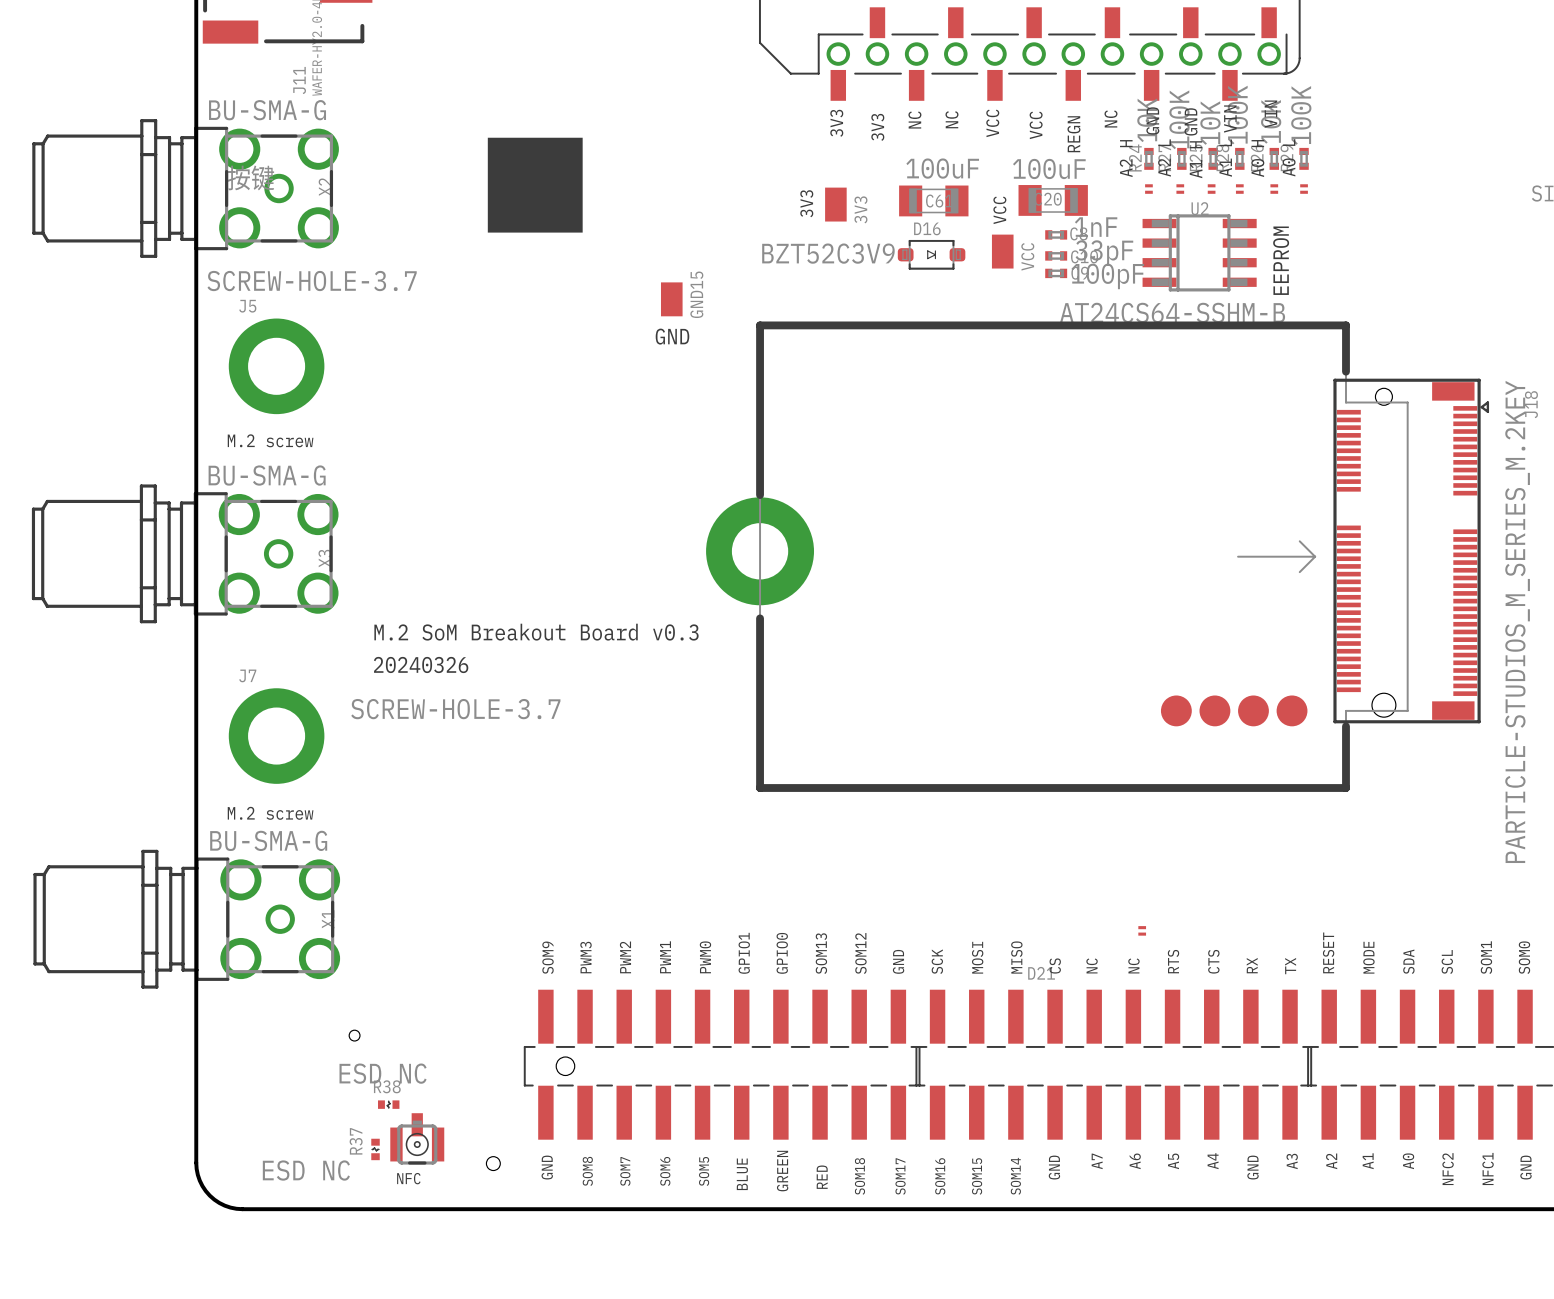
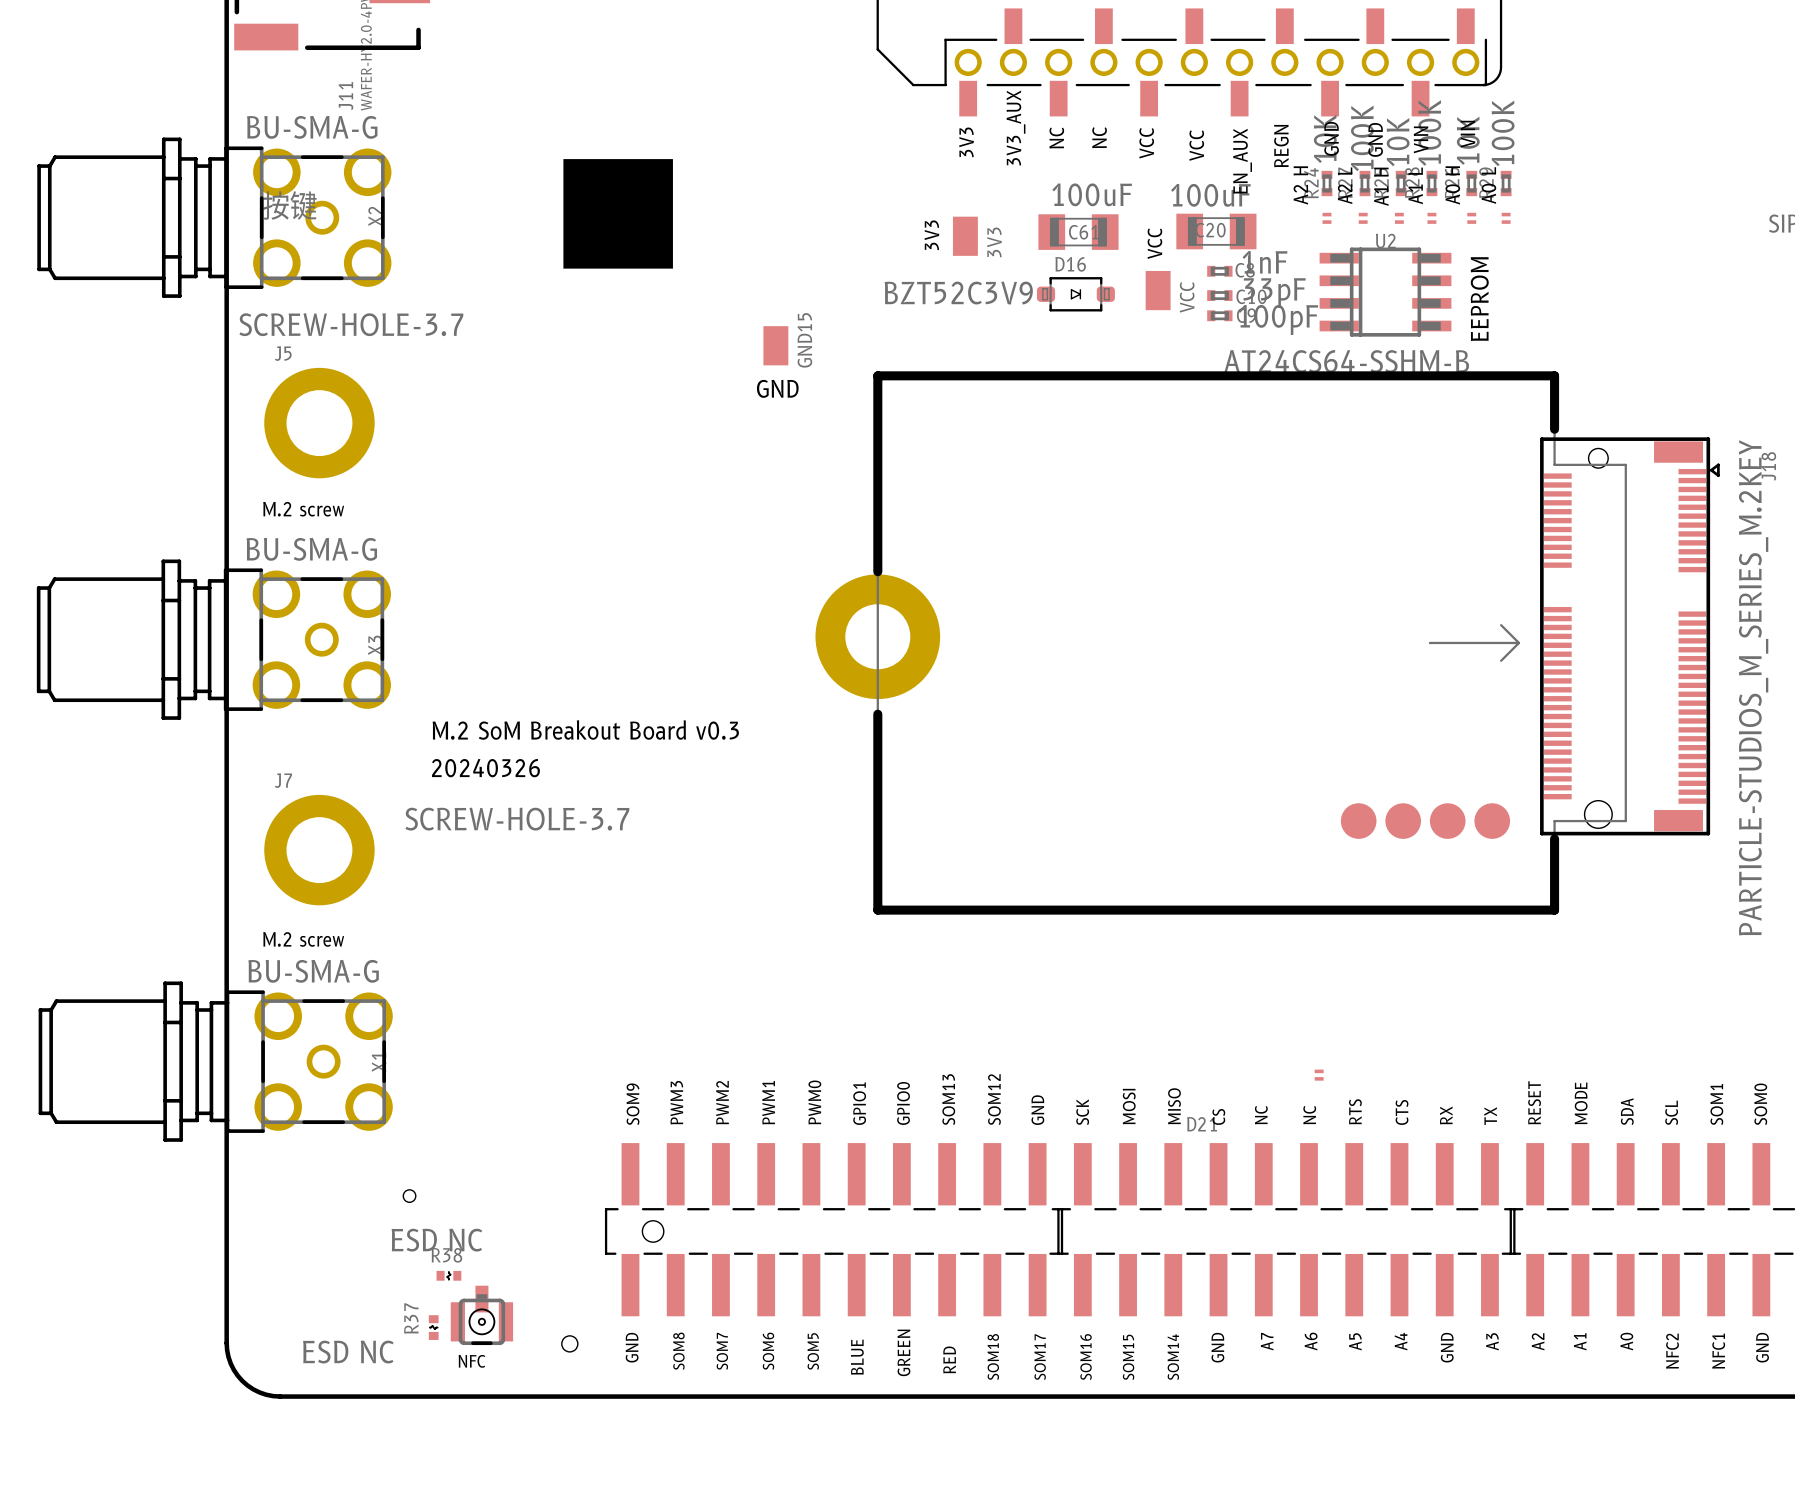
text: NC (1110, 118) -> none
text: none -> REGN (1281, 146)
text: 3V3 (877, 127) -> 3V3_AUX (1016, 128)
text: REGN (1073, 134) -> EN_AUX (1242, 161)

